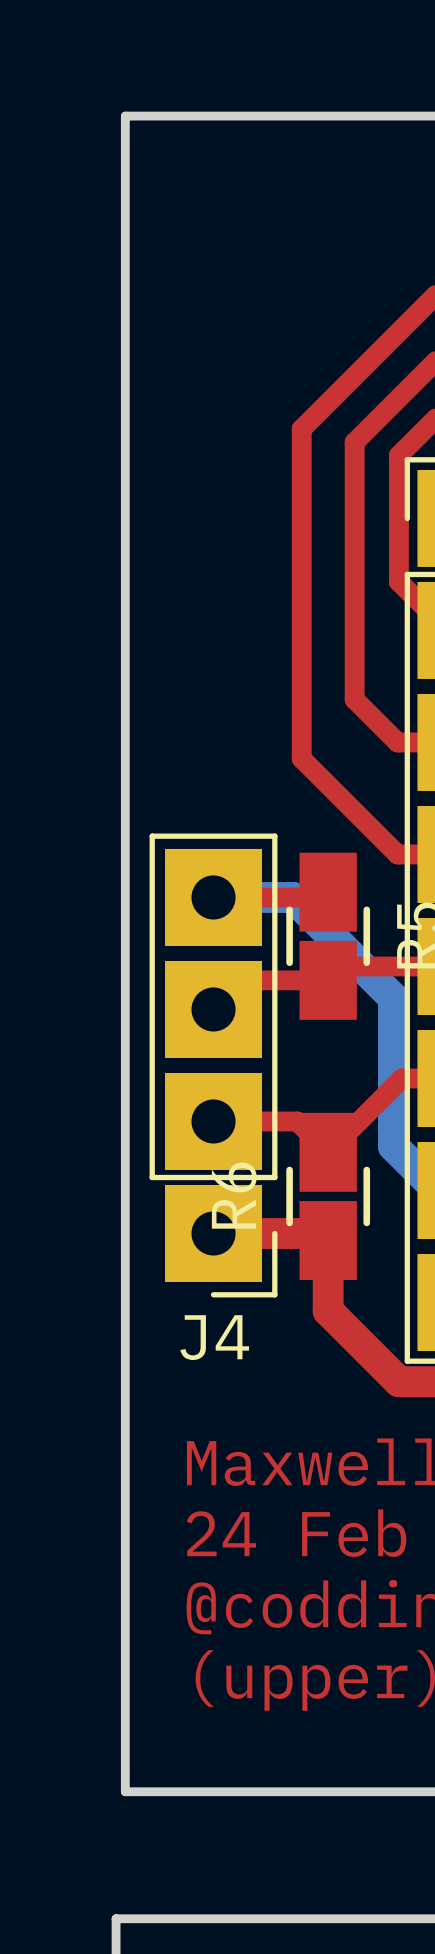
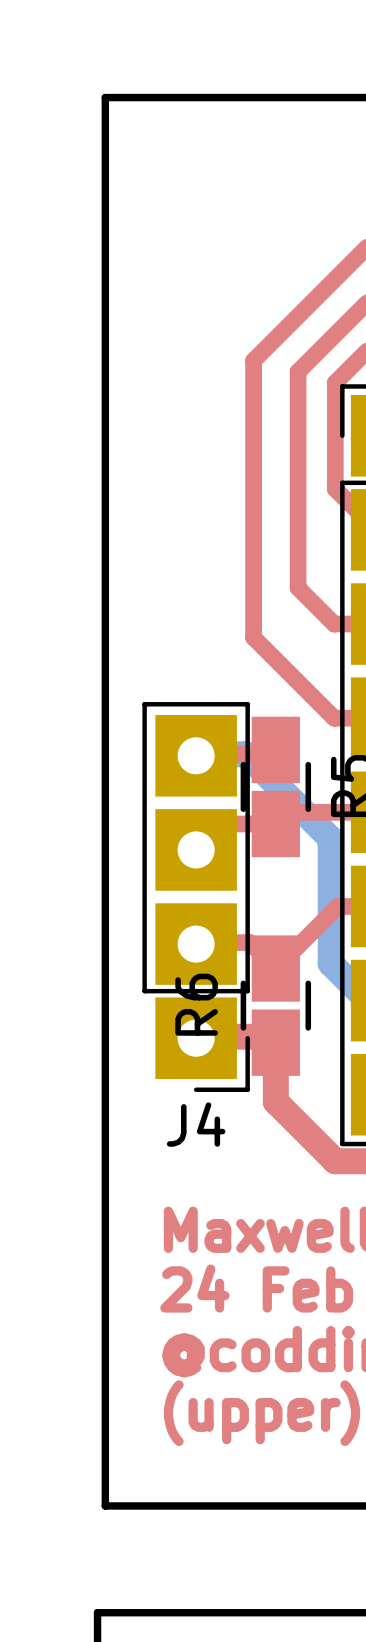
J4 position: (213, 1065) -> (196, 897)

